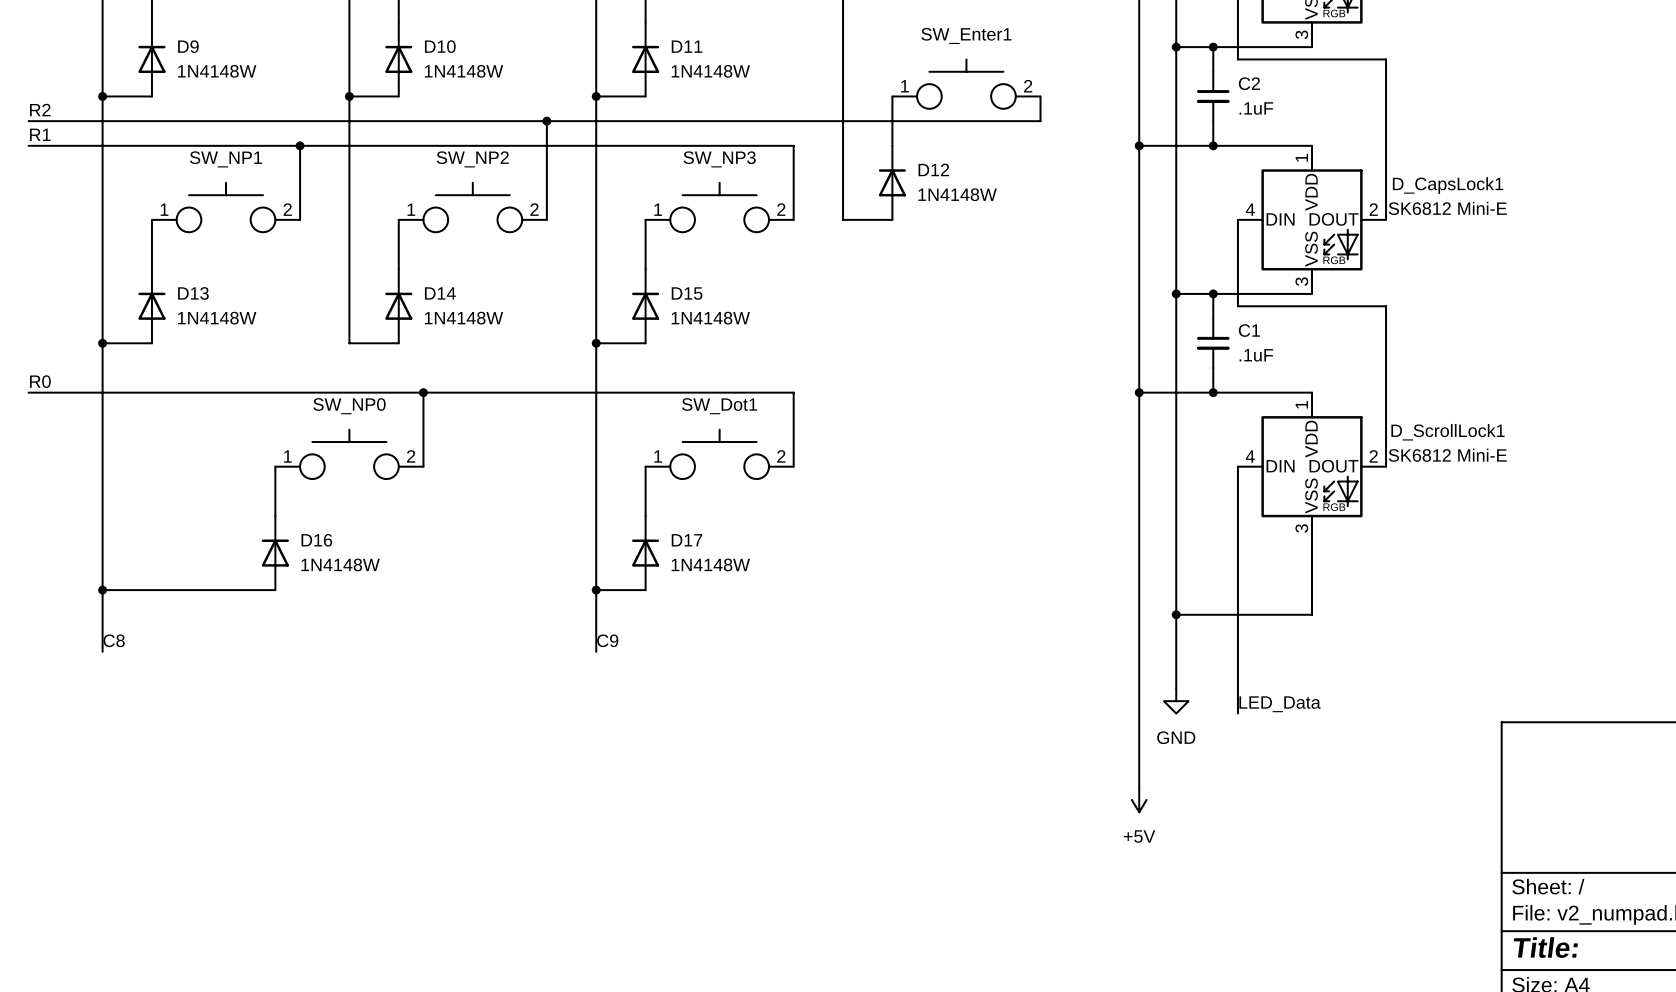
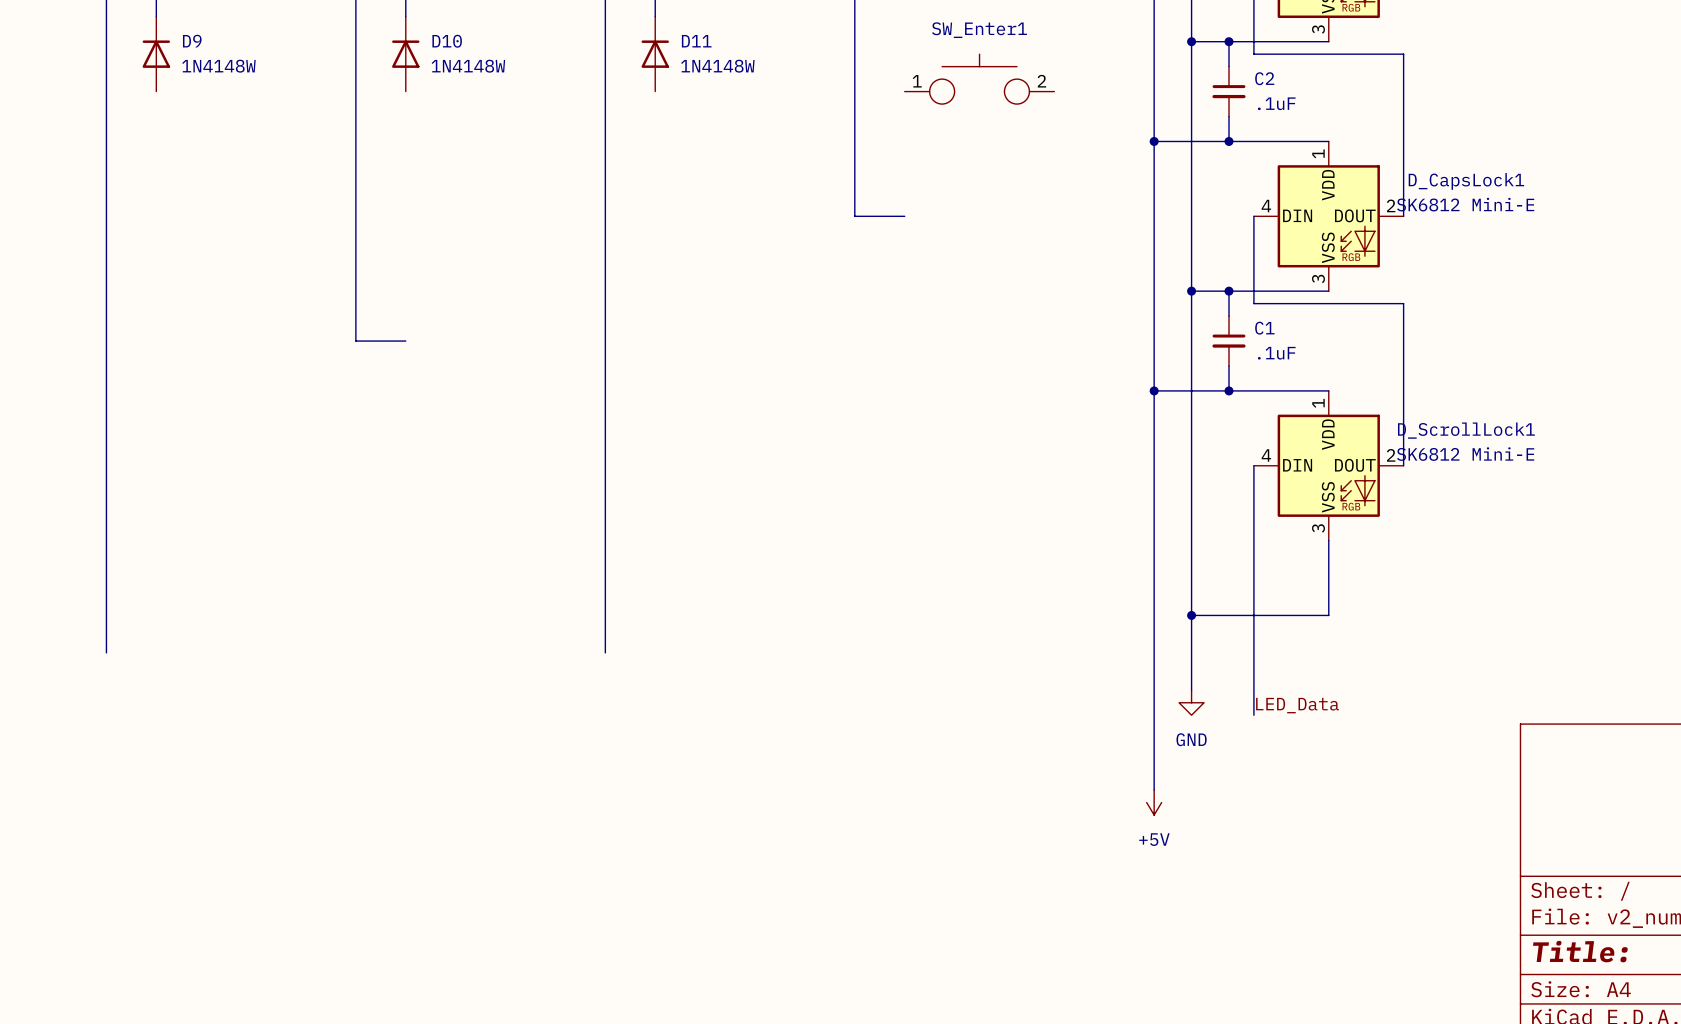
wire: (102, 96) (151, 96) -> none
junction: (102, 96) -> none
wire: (349, 96) (398, 96) -> none
junction: (349, 96) -> none
wire: (596, 96) (645, 96) -> none
junction: (596, 96) -> none
wire: (892, 96) (892, 145) -> none
wire: (1040, 96) (1040, 121) (28, 121) -> none
label: R2 (40, 110) -> none
wire: (546, 121) (546, 219) -> none
junction: (546, 121) -> none
label: R1 (40, 134) -> none
wire: (28, 145) (793, 145) (793, 219) -> none
wire: (300, 145) (300, 219) -> none
junction: (300, 145) -> none
D12: 1N4148W (892, 182) -> none
SW_NP1: (226, 207) -> none
SW_NP2: (472, 207) -> none
SW_NP3: (719, 207) -> none
wire: (151, 219) (151, 269) -> none
wire: (398, 219) (398, 269) -> none
wire: (645, 219) (645, 269) -> none
D13: 1N4148W (151, 306) -> none
D14: 1N4148W (398, 306) -> none
D15: 1N4148W (645, 306) -> none
wire: (102, 343) (151, 343) -> none
junction: (102, 343) -> none
wire: (596, 343) (645, 343) -> none
junction: (596, 343) -> none
label: R0 (40, 381) -> none
wire: (28, 392) (793, 392) (793, 466) -> none
wire: (423, 392) (423, 466) -> none
junction: (423, 392) -> none
SW_NP0: (349, 454) -> none
SW_Dot1: (719, 454) -> none
wire: (275, 466) (275, 516) -> none
wire: (645, 466) (645, 516) -> none
D16: 1N4148W (275, 553) -> none
D17: 1N4148W (645, 553) -> none
wire: (102, 590) (275, 590) -> none
junction: (102, 590) -> none
wire: (596, 590) (645, 590) -> none
junction: (596, 590) -> none
label: C8 (114, 640) -> none
label: C9 (607, 640) -> none

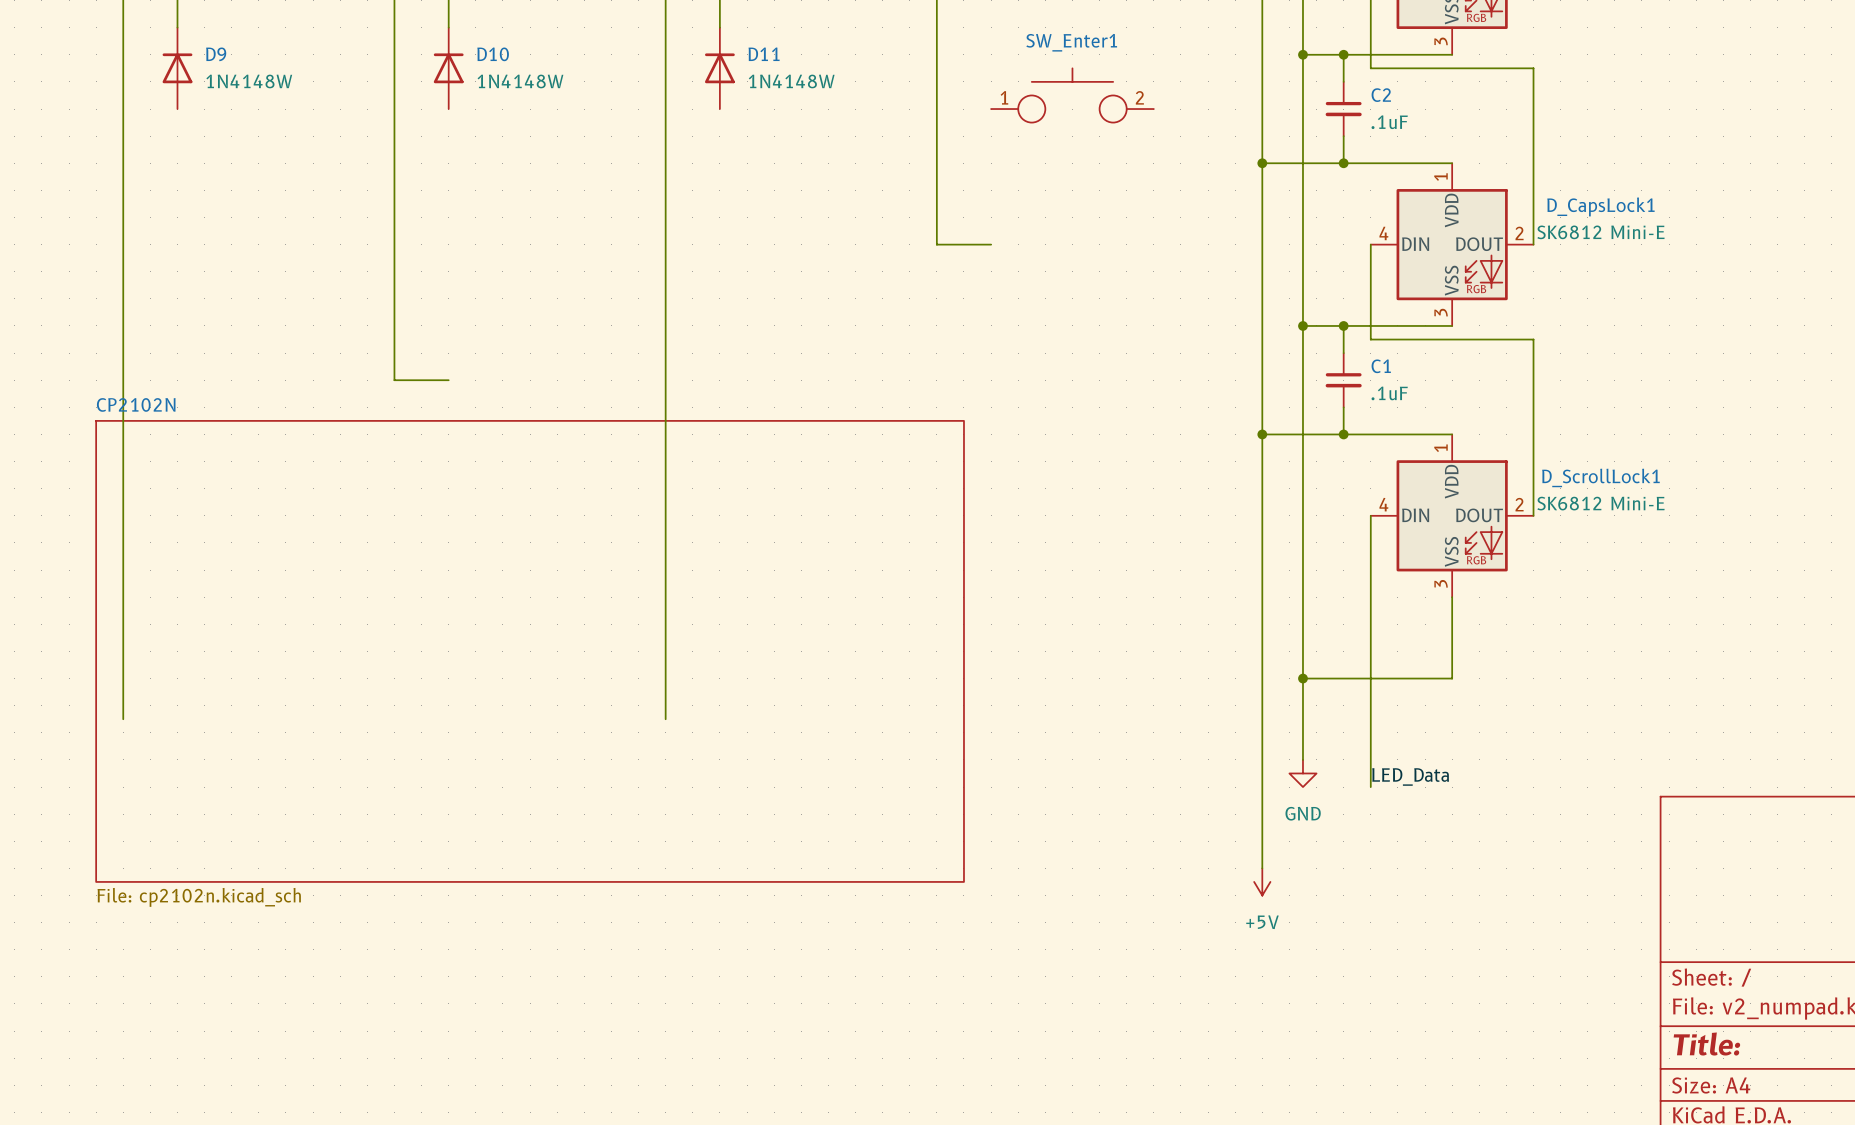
sheet CP2102N: none -> File: cp2102n.kicad_sch (530, 651)

